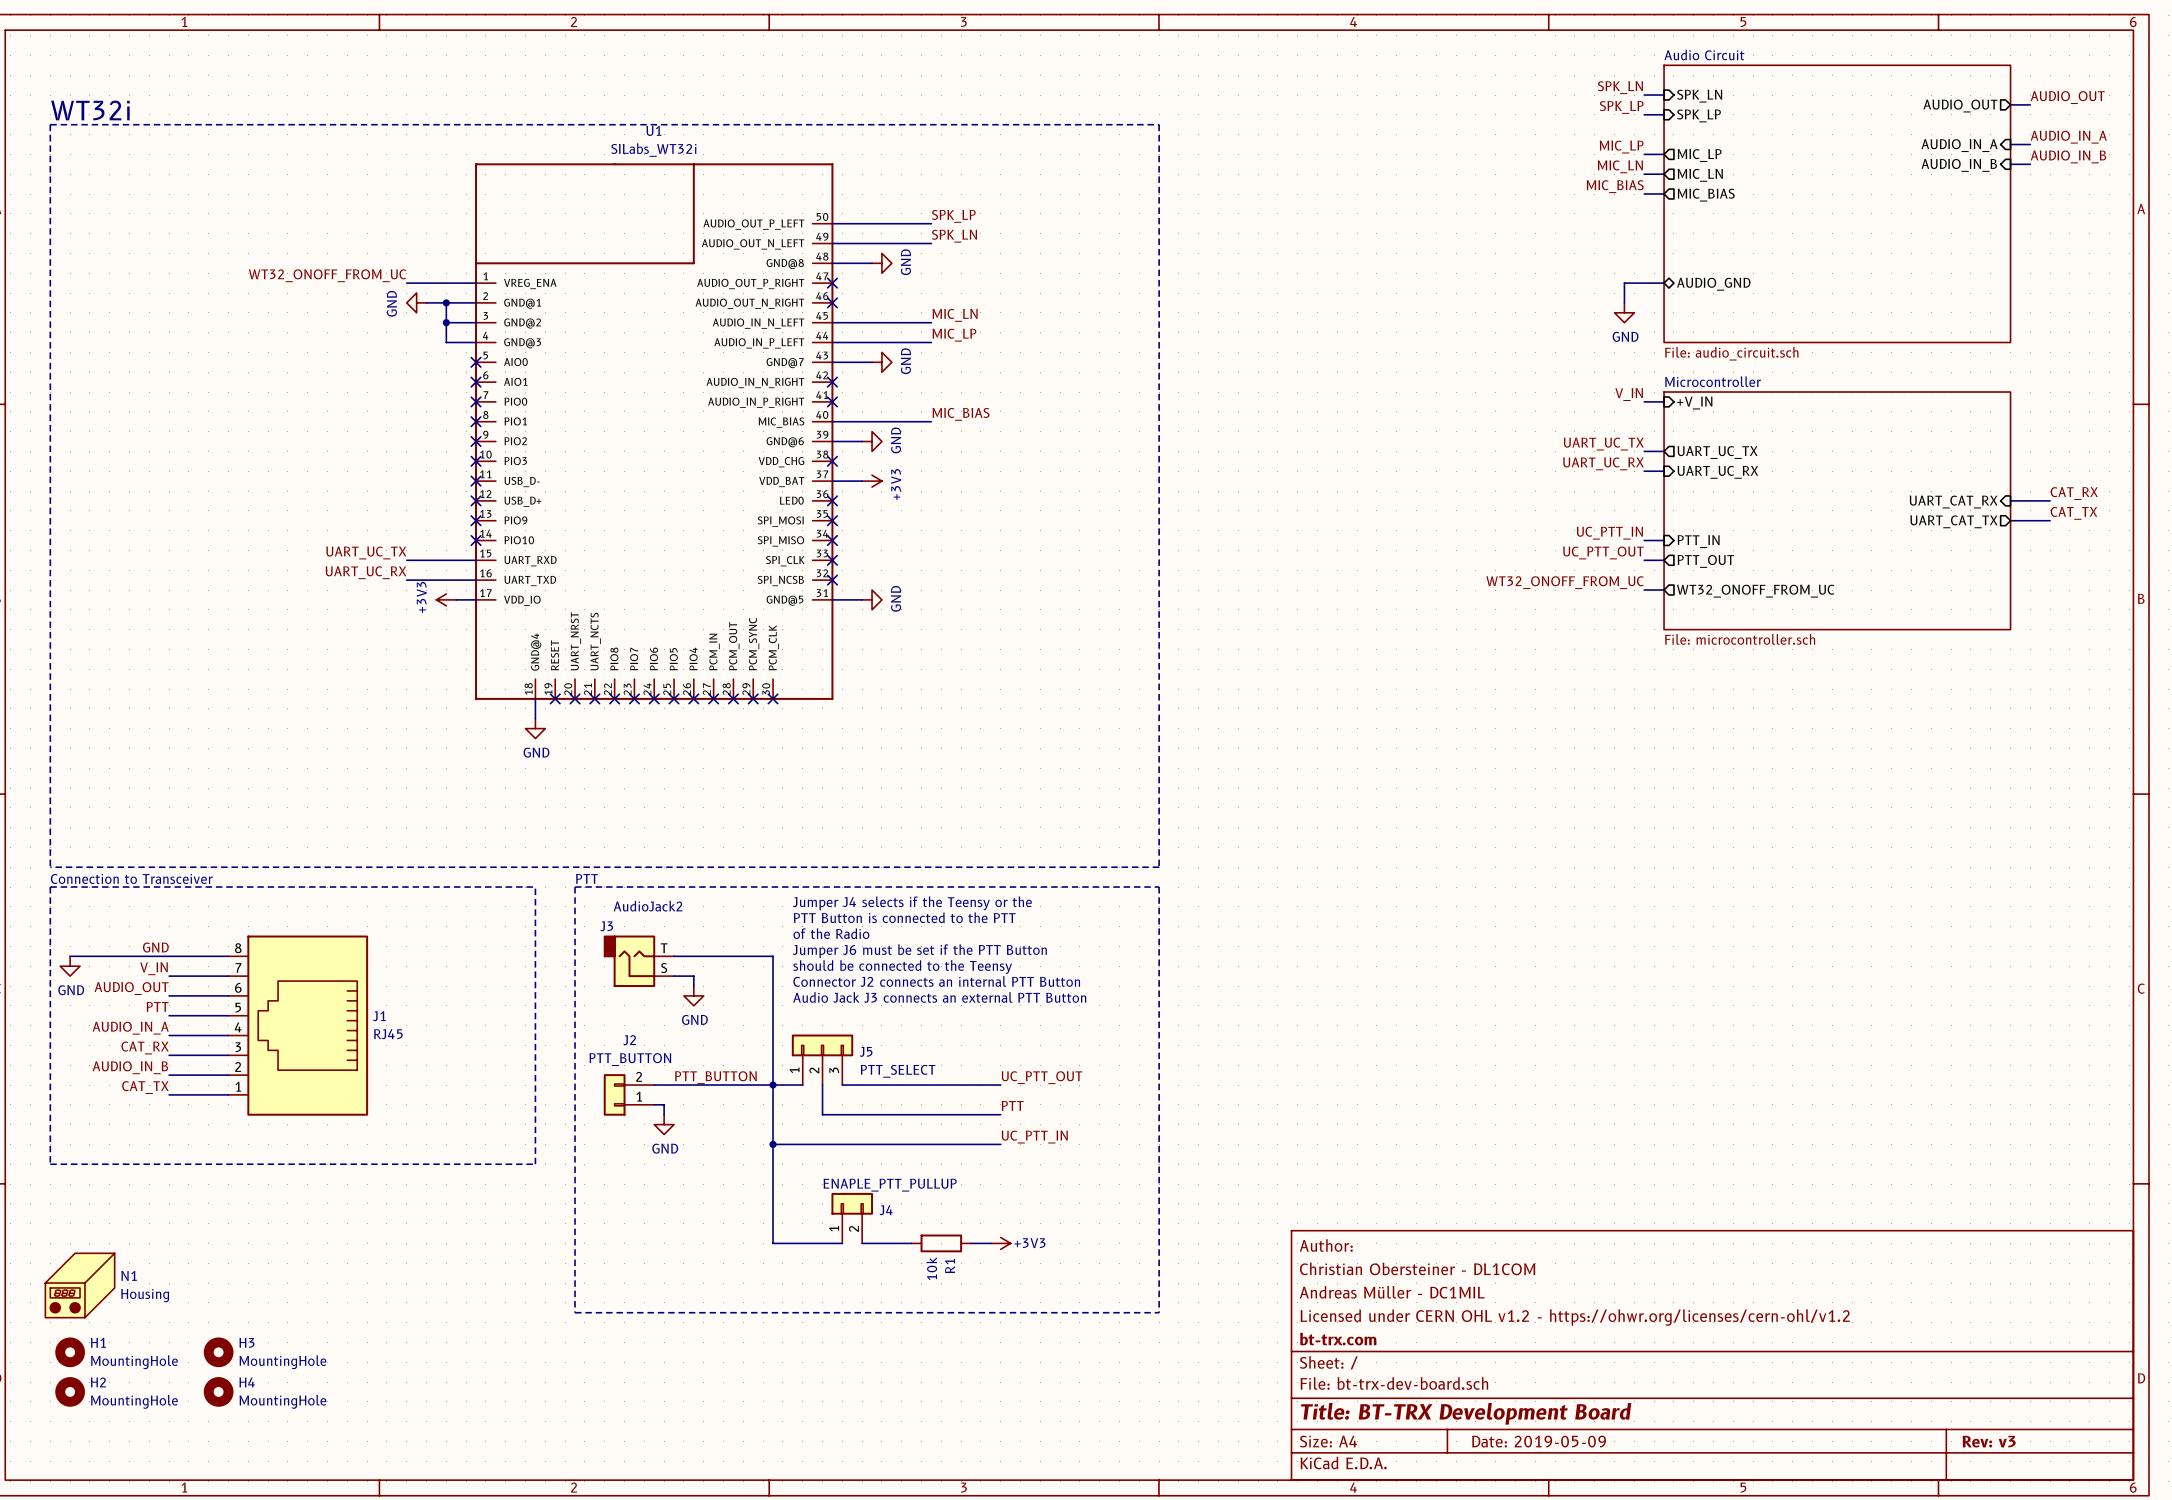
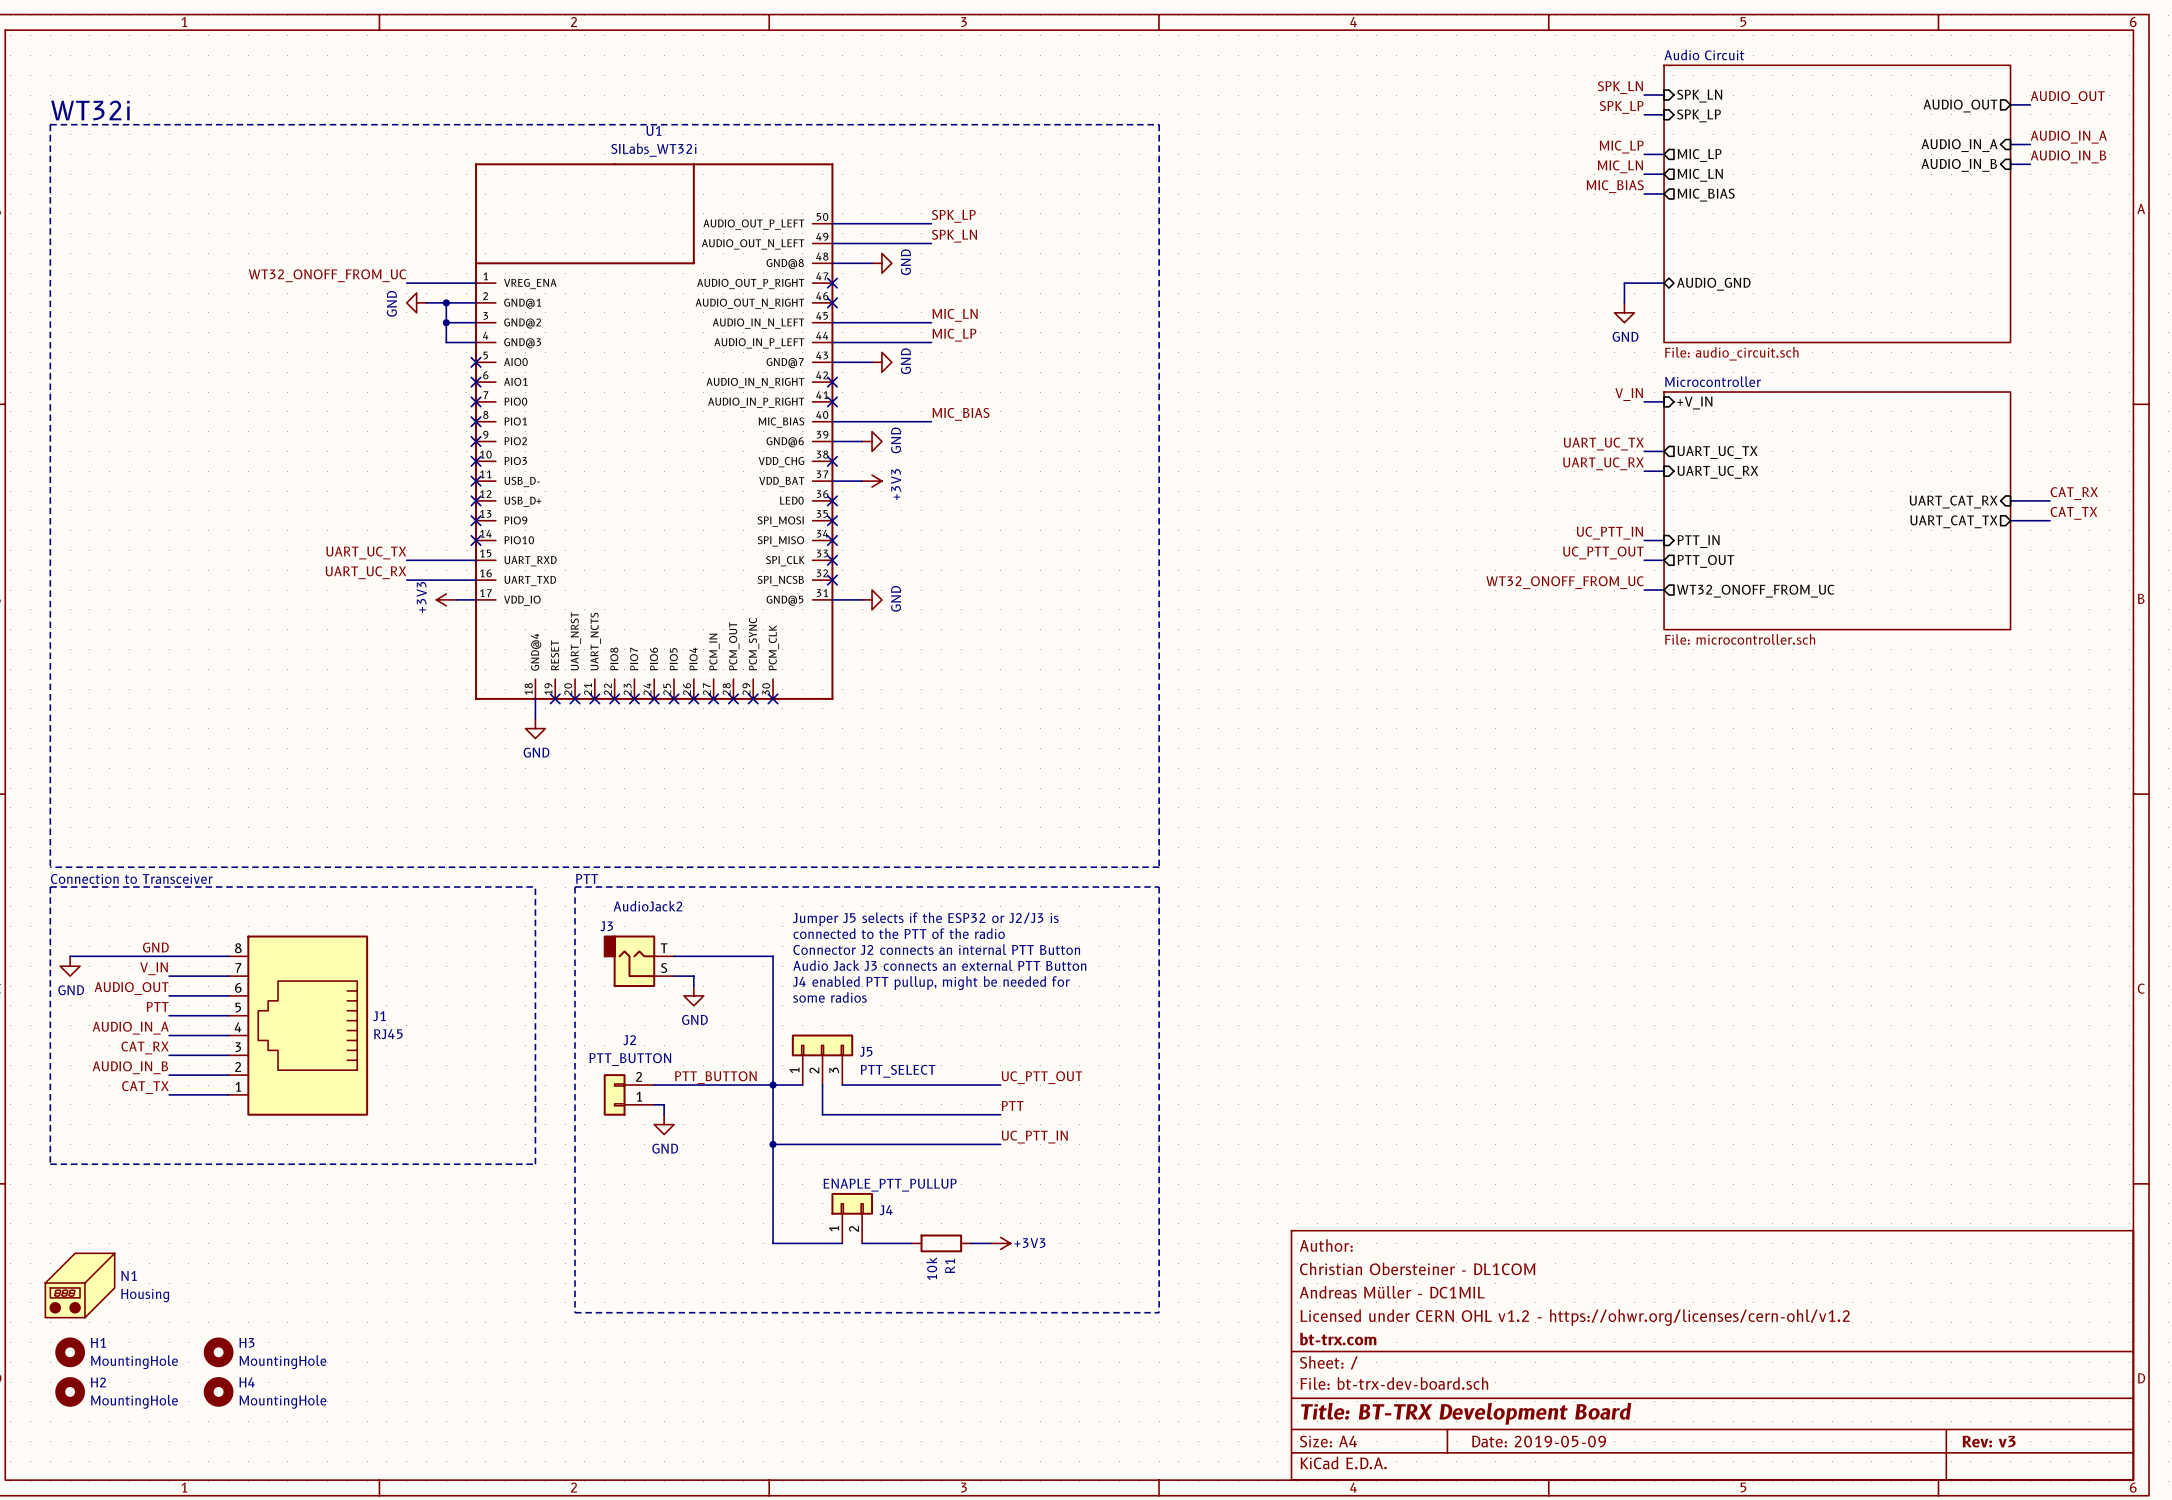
text: Jumper J4 selects if the Teensy or the (912, 903) -> none
text: PTT Button is connected to the PTT (904, 917) -> Jumper J5 selects if the ESP32 or J2/J3 is (925, 919)
text: of the Radio (831, 933) -> connected to the PTT of the radio (899, 933)
text: Jumper J6 must be set if the PTT Button (919, 951) -> Connector J2 connects an internal PTT Button (936, 949)
text: should be connected to the Teensy (902, 967) -> Audio Jack J3 connects an external PTT Button (939, 965)
text: Connector J2 connects an internal PTT Button (936, 981) -> J4 enabled PTT pullup, might be needed for (931, 983)
text: Audio Jack J3 connects an external PTT Button (939, 997) -> some radios (830, 997)

